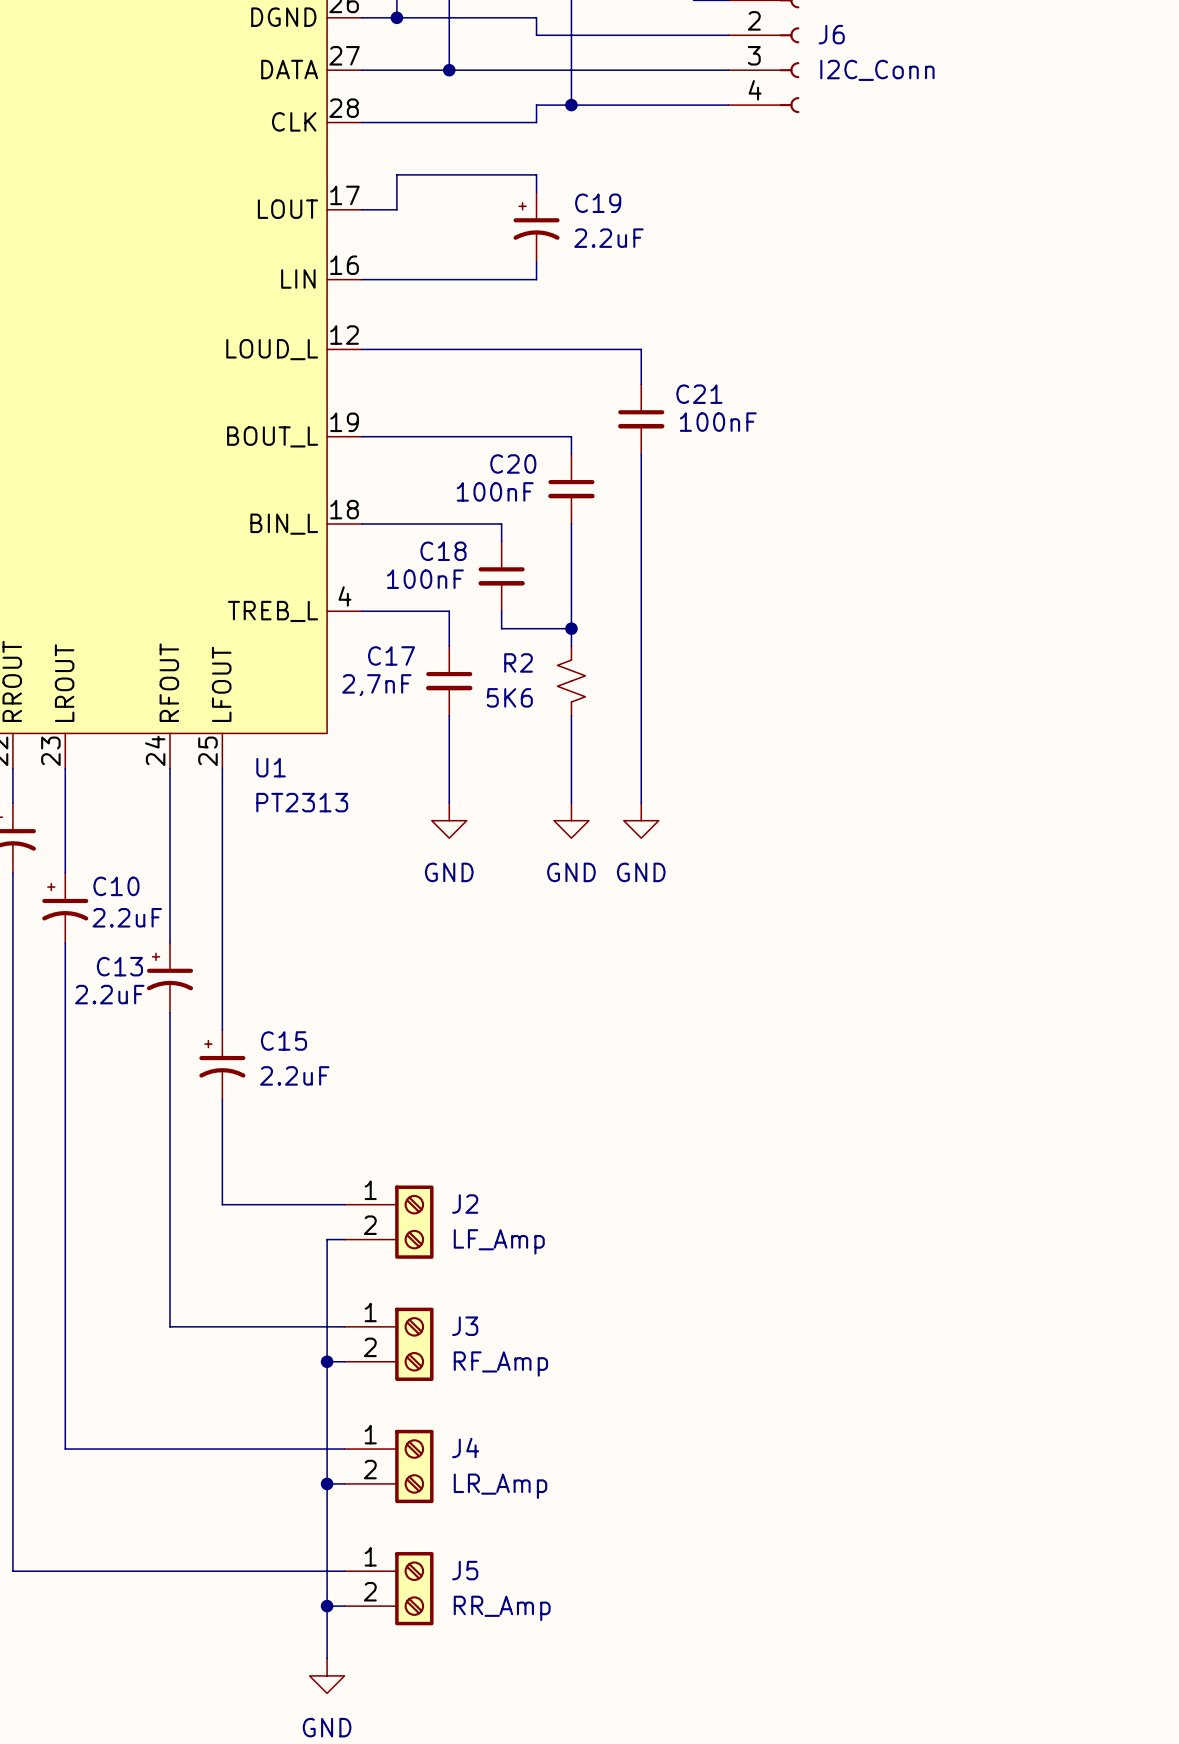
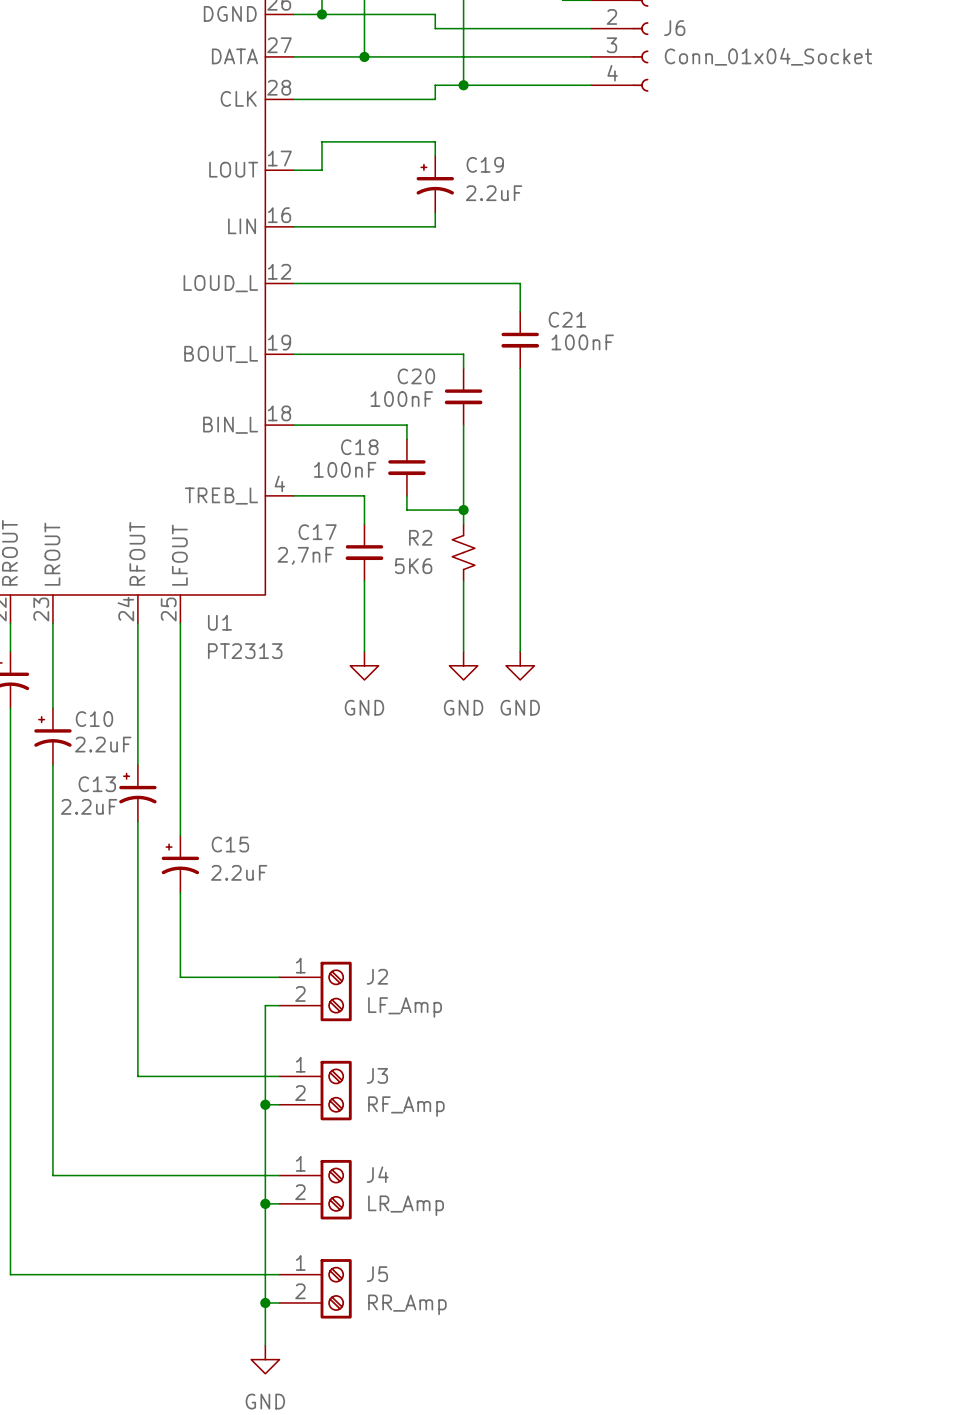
J6 value: I2C_Conn (877, 70) -> Conn_01x04_Socket (768, 56)

